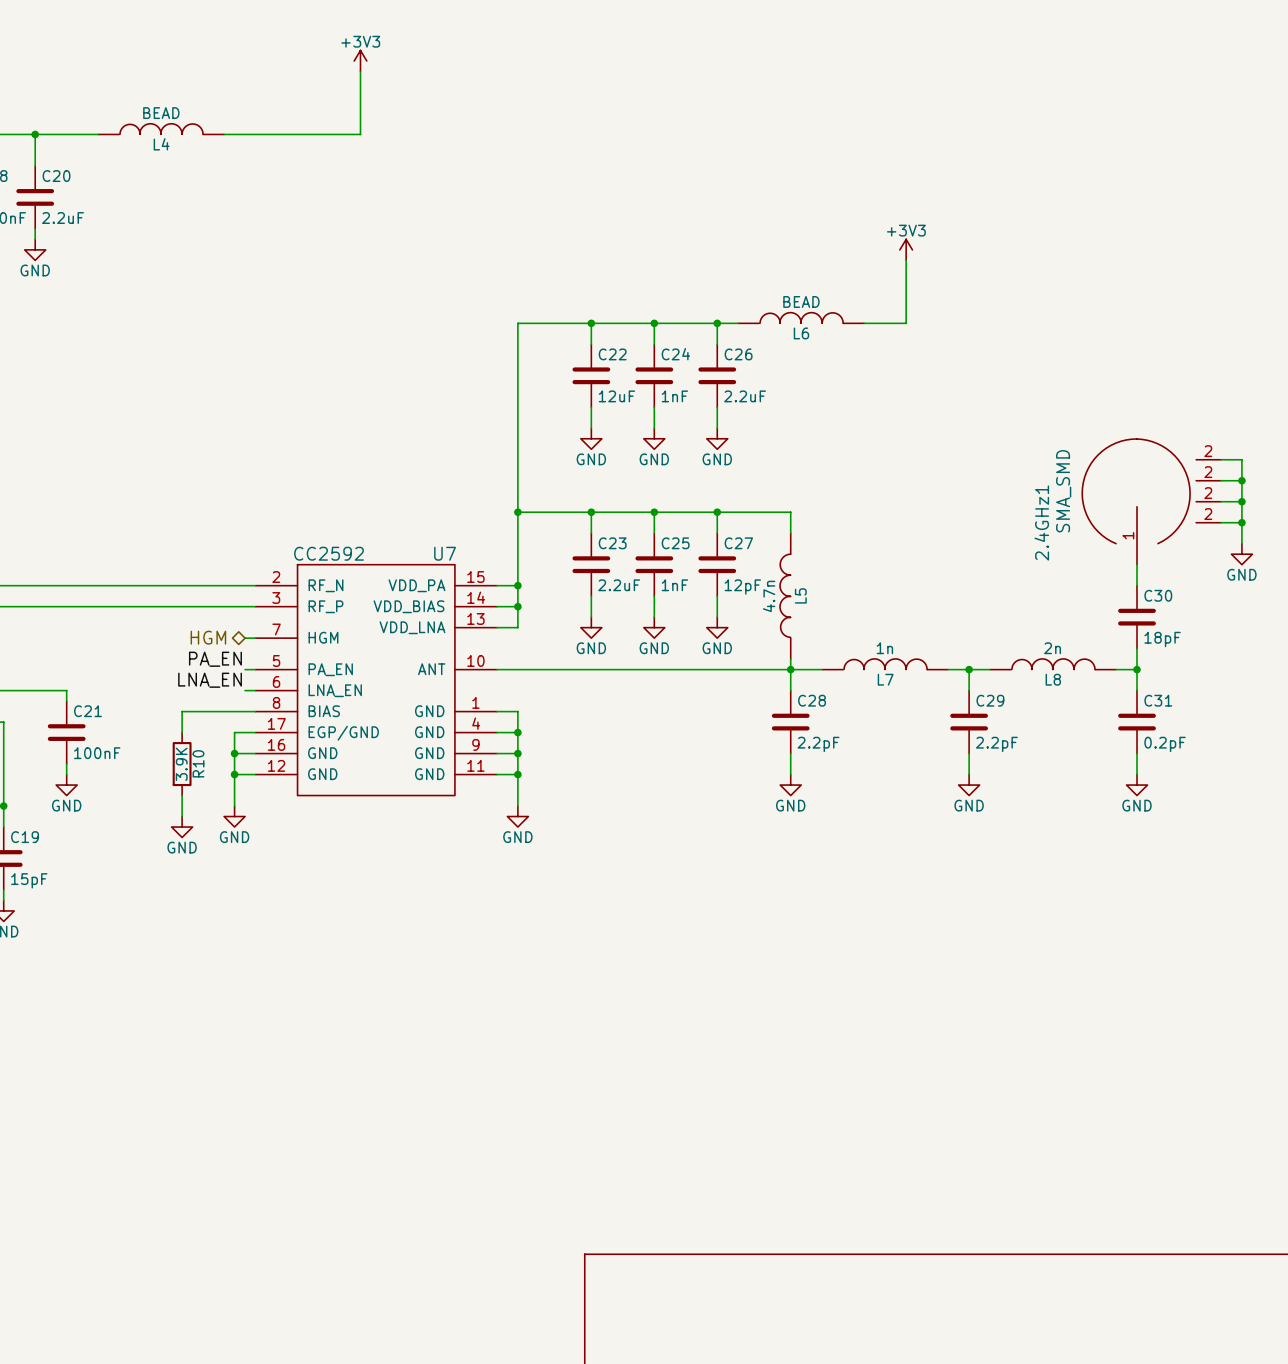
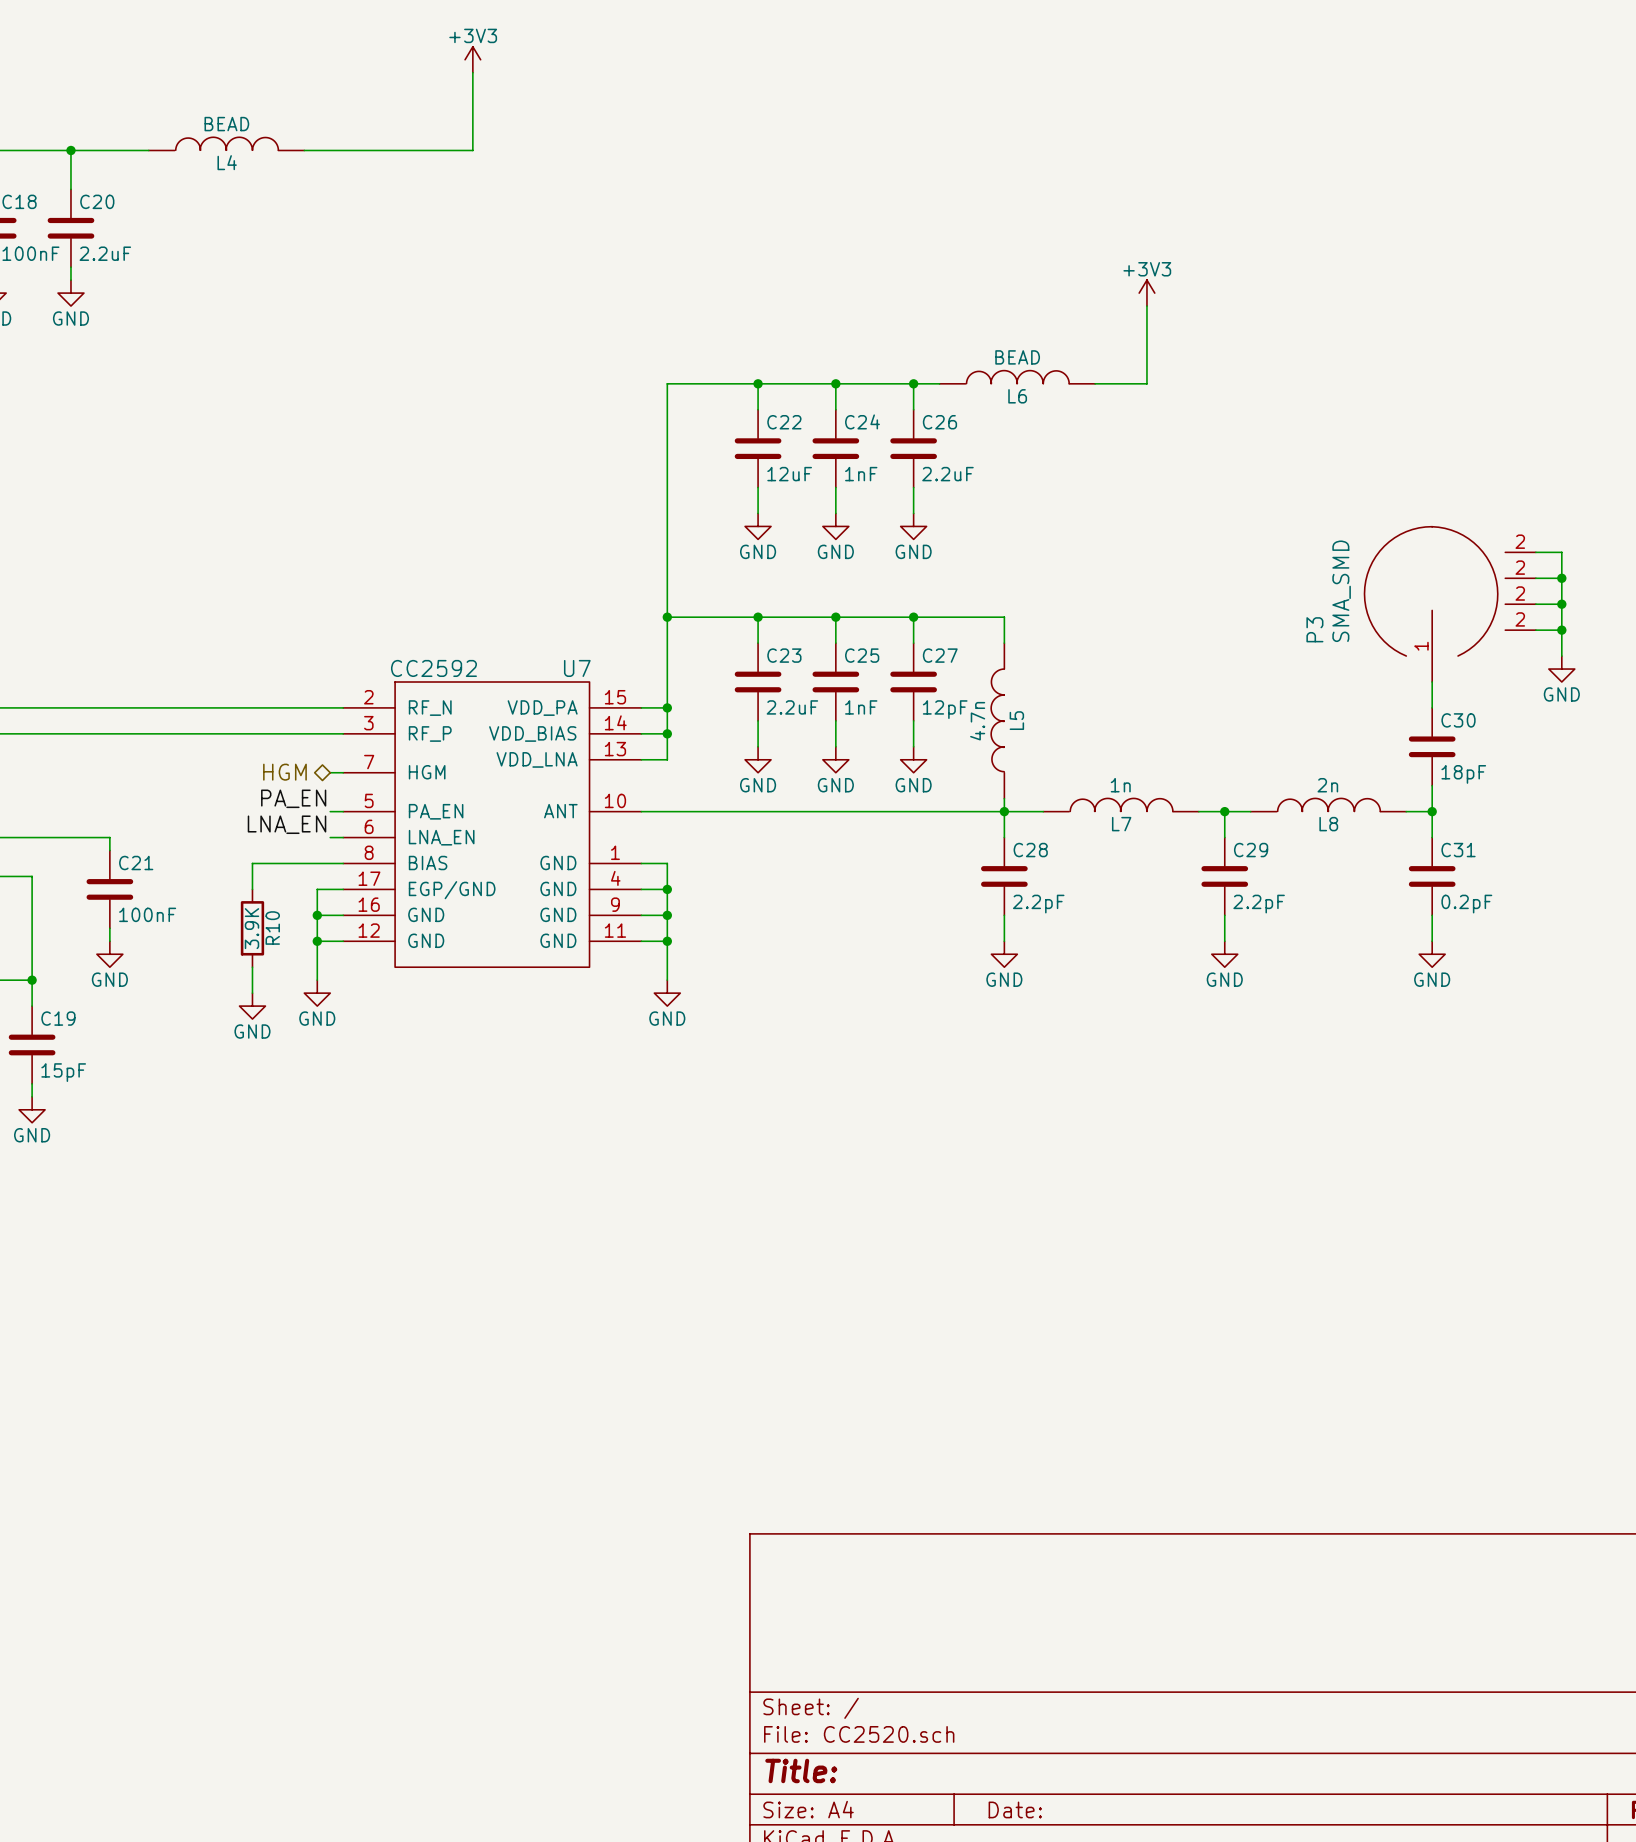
2.4GHz1 name: 2.4GHz1 (1041, 523) -> P3 (1314, 629)

